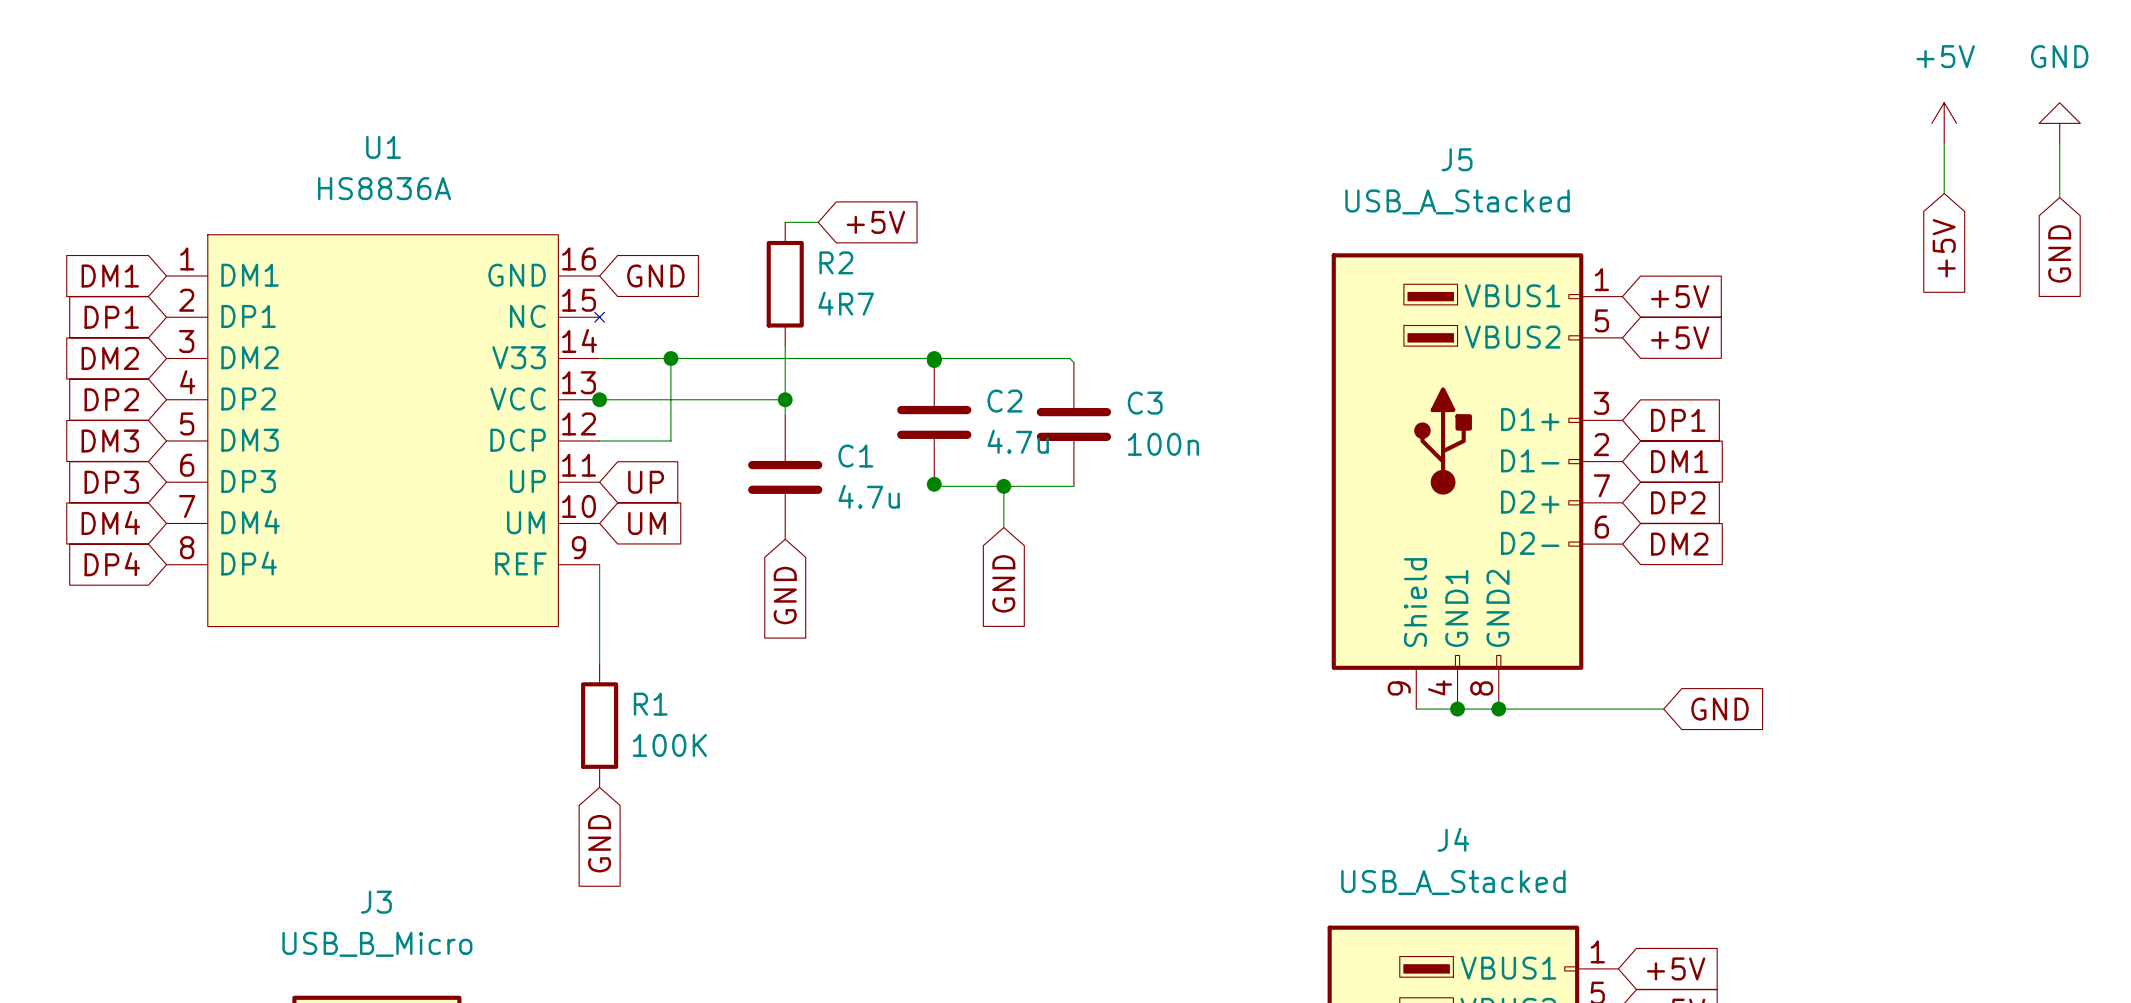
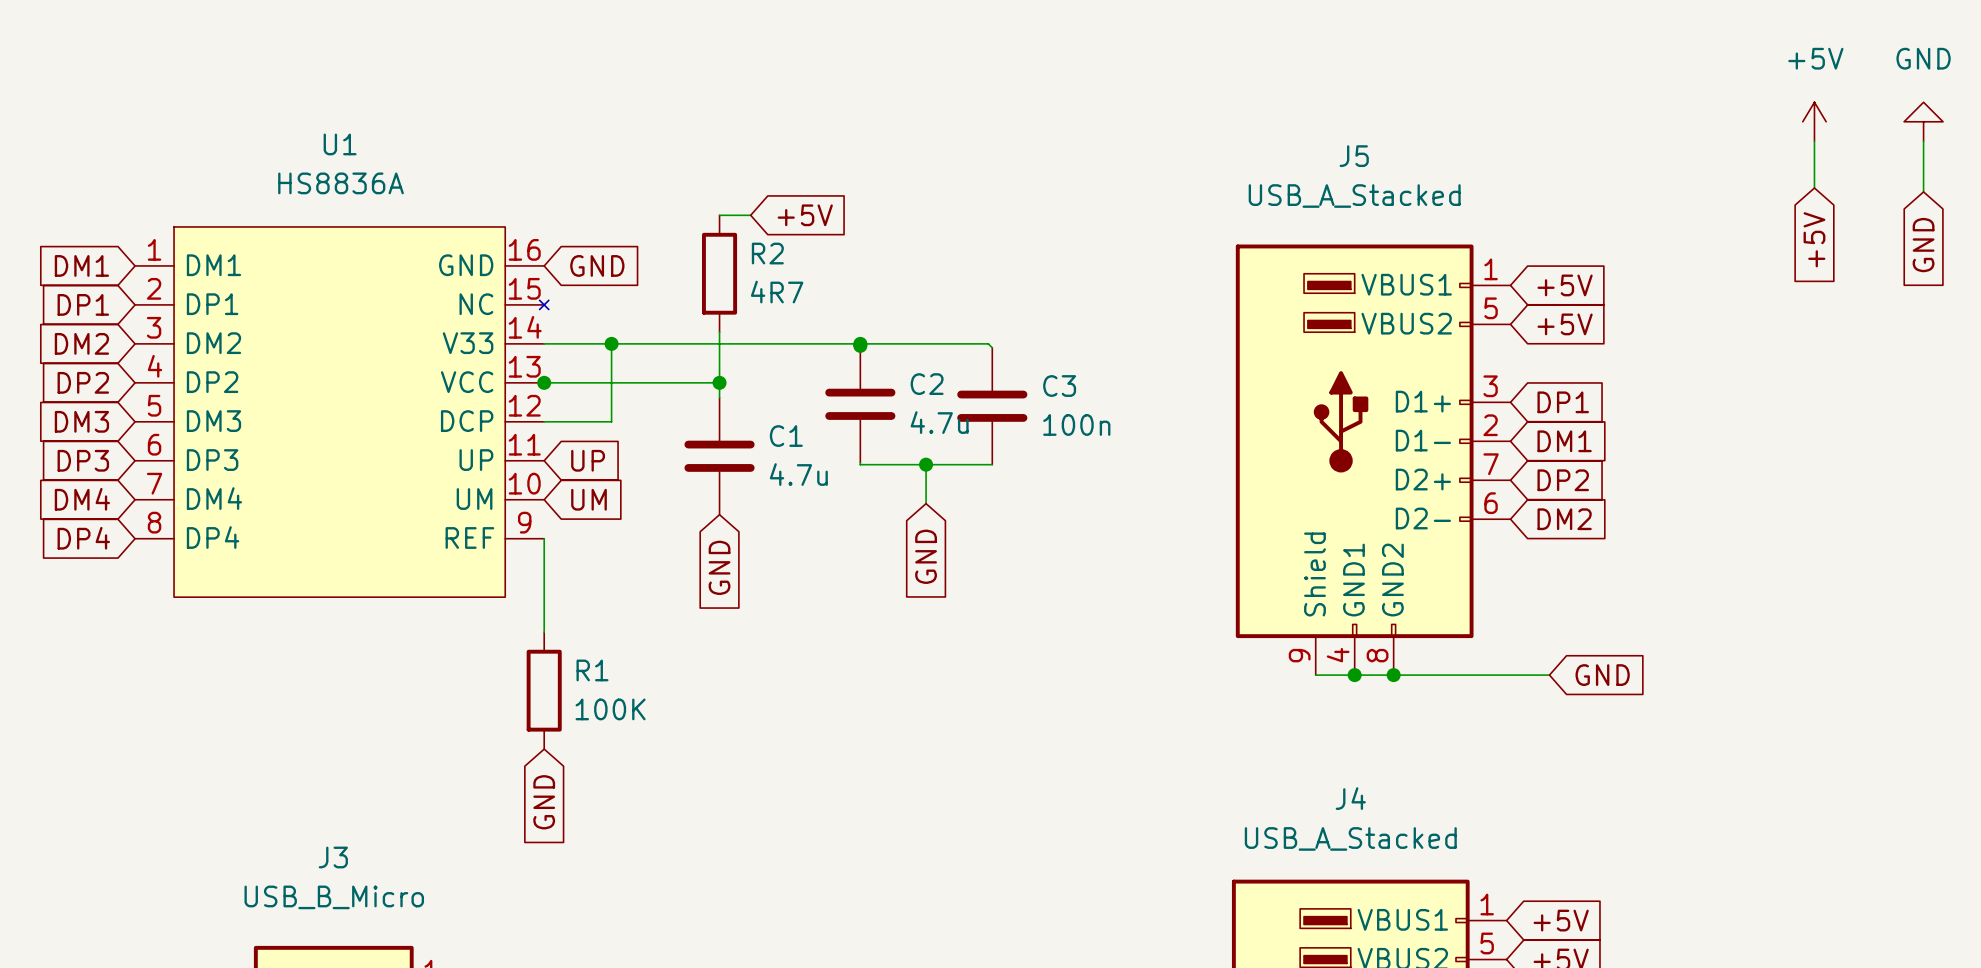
junction: (934, 484) -> none

